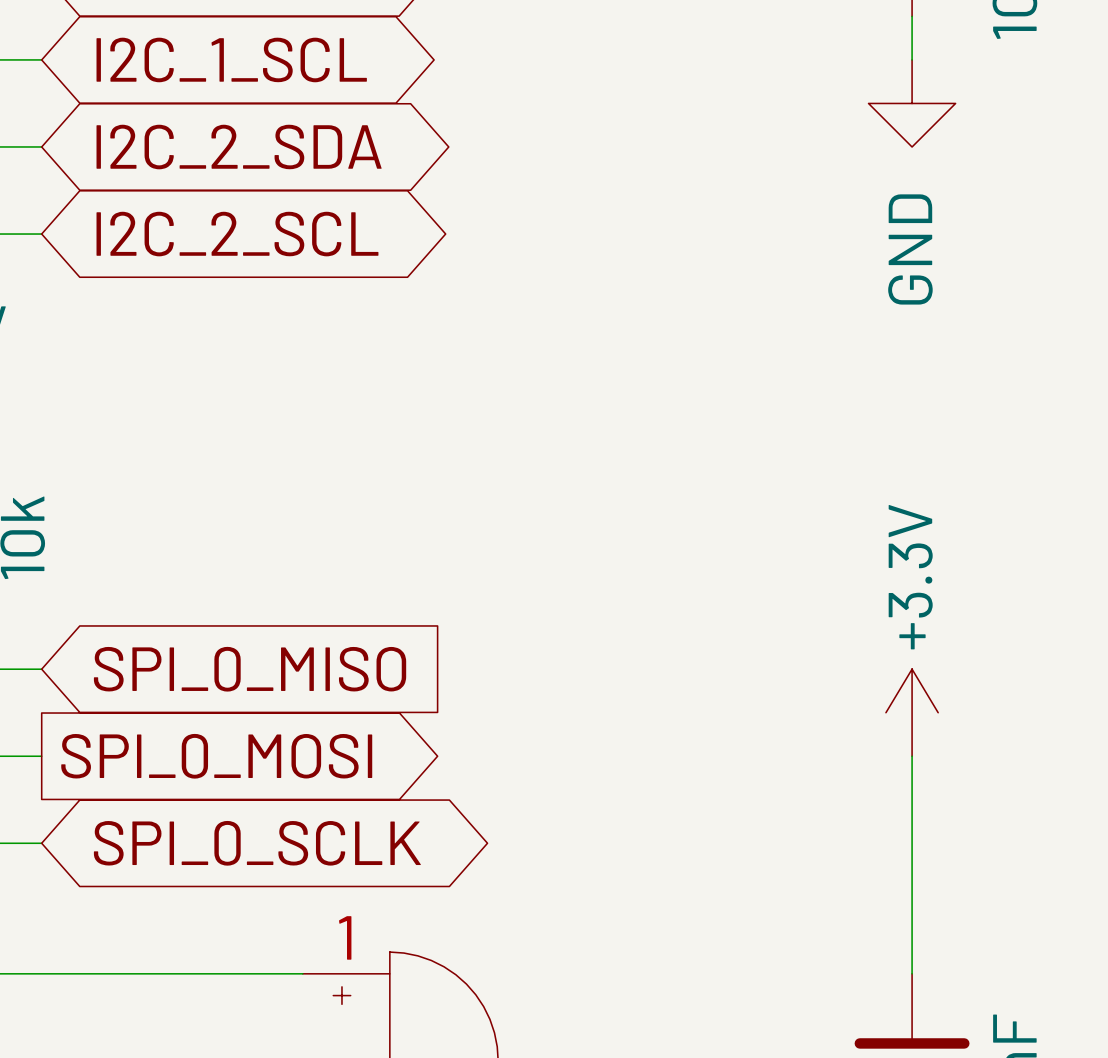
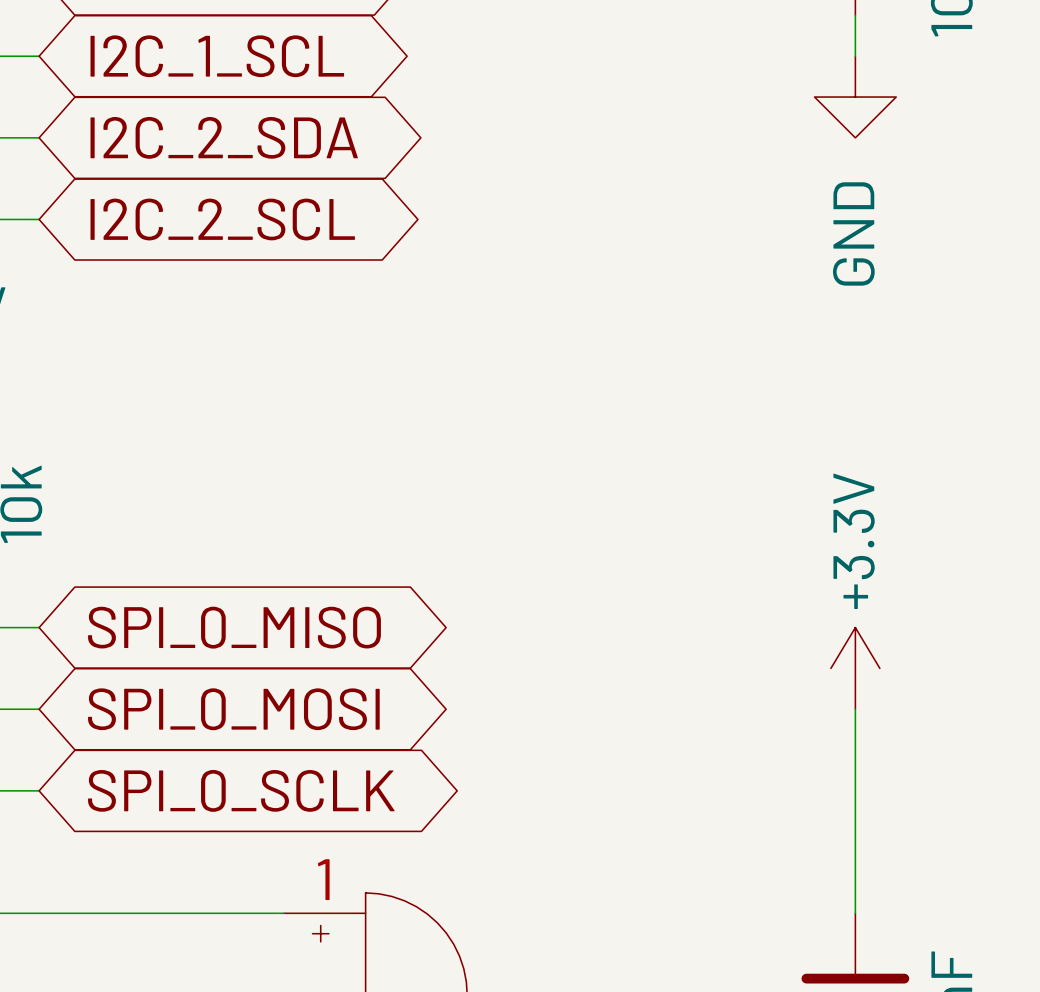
global label shape: input (250, 669) -> bidirectional (234, 627)
global label shape: output (216, 756) -> bidirectional (233, 709)

